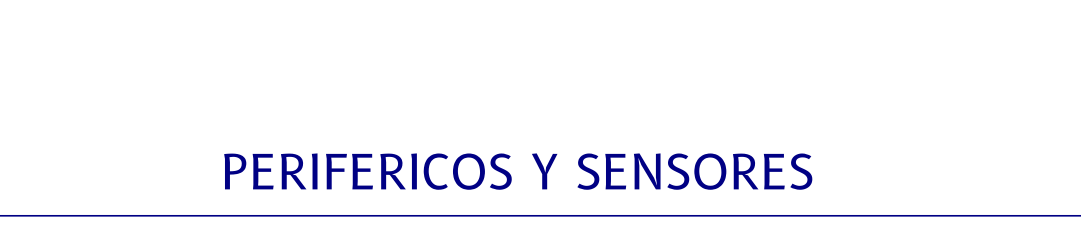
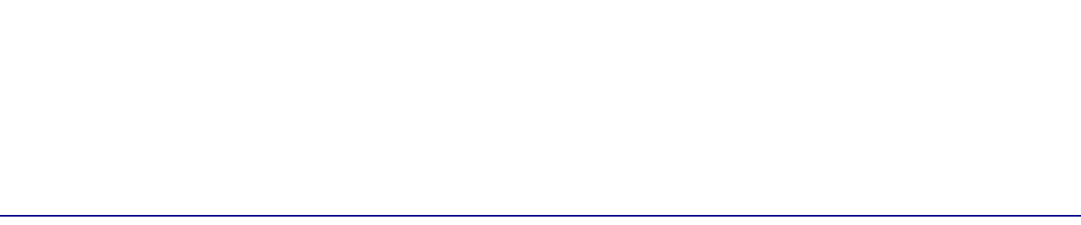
text: PERIFERICOS Y SENSORES (518, 171) -> none

